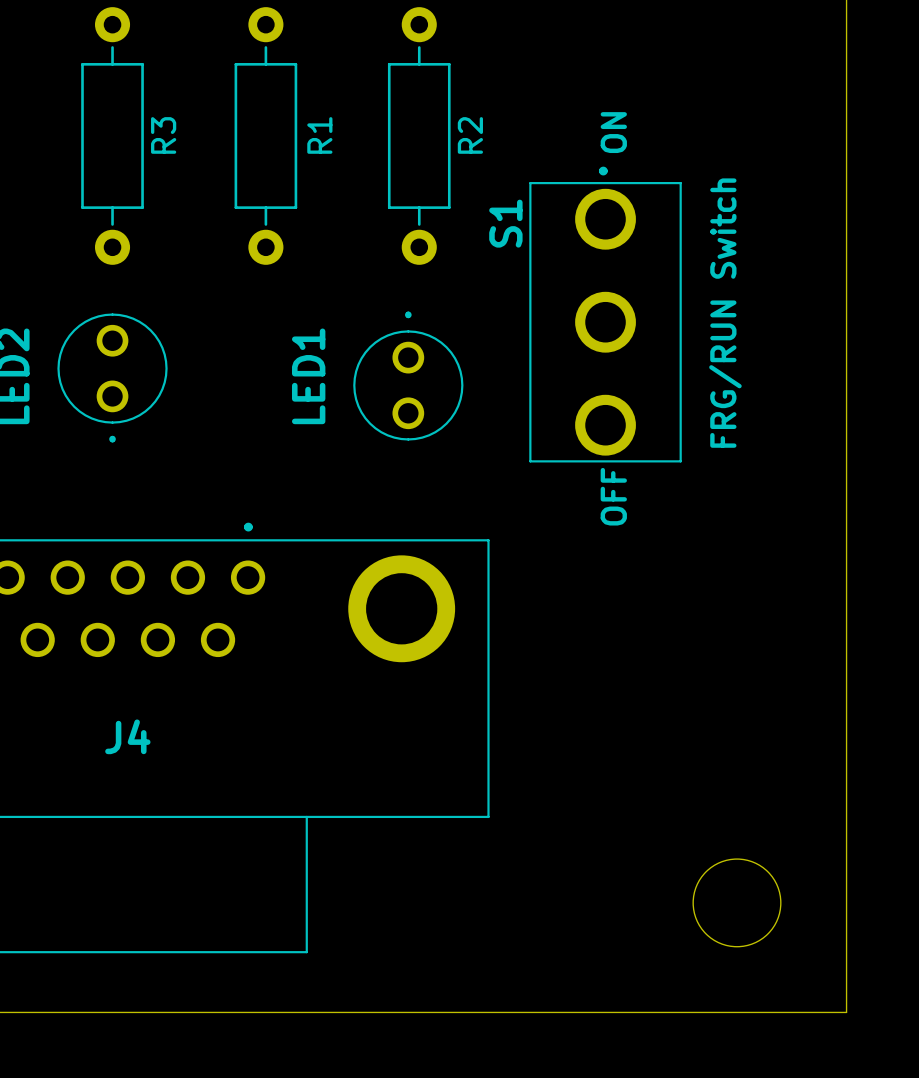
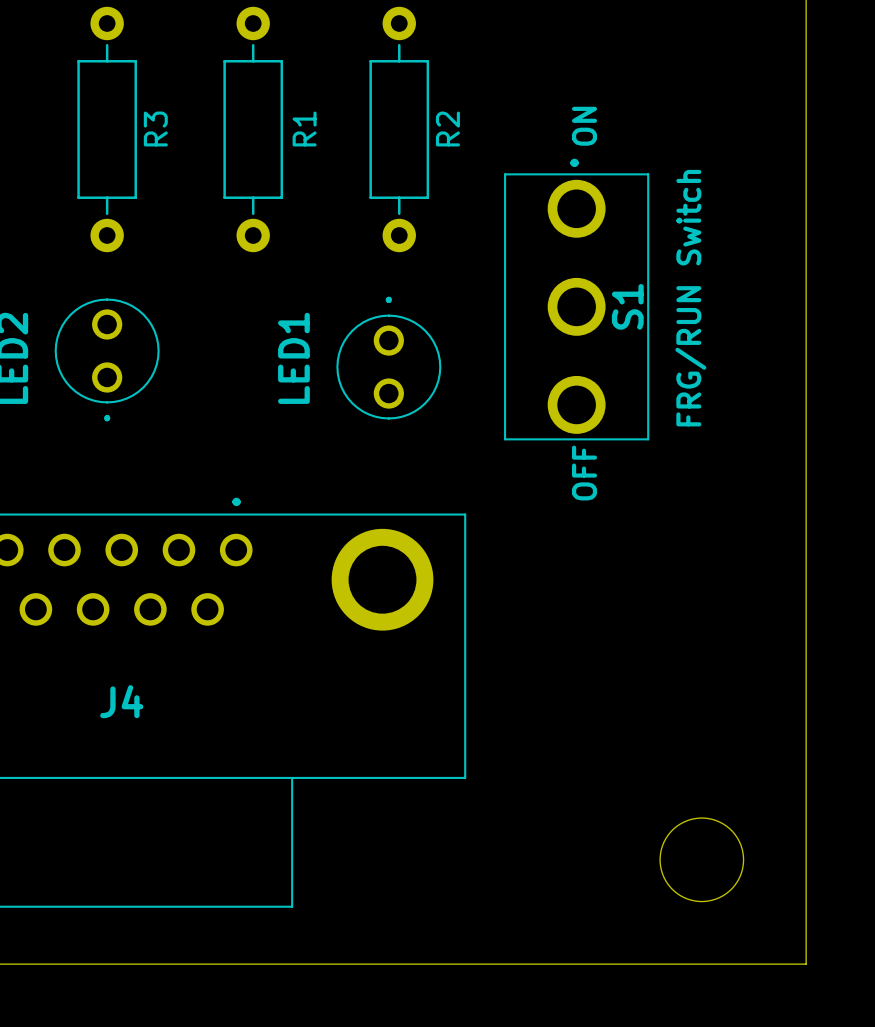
S1 name position: S1 (505, 223) -> S1 (627, 306)

